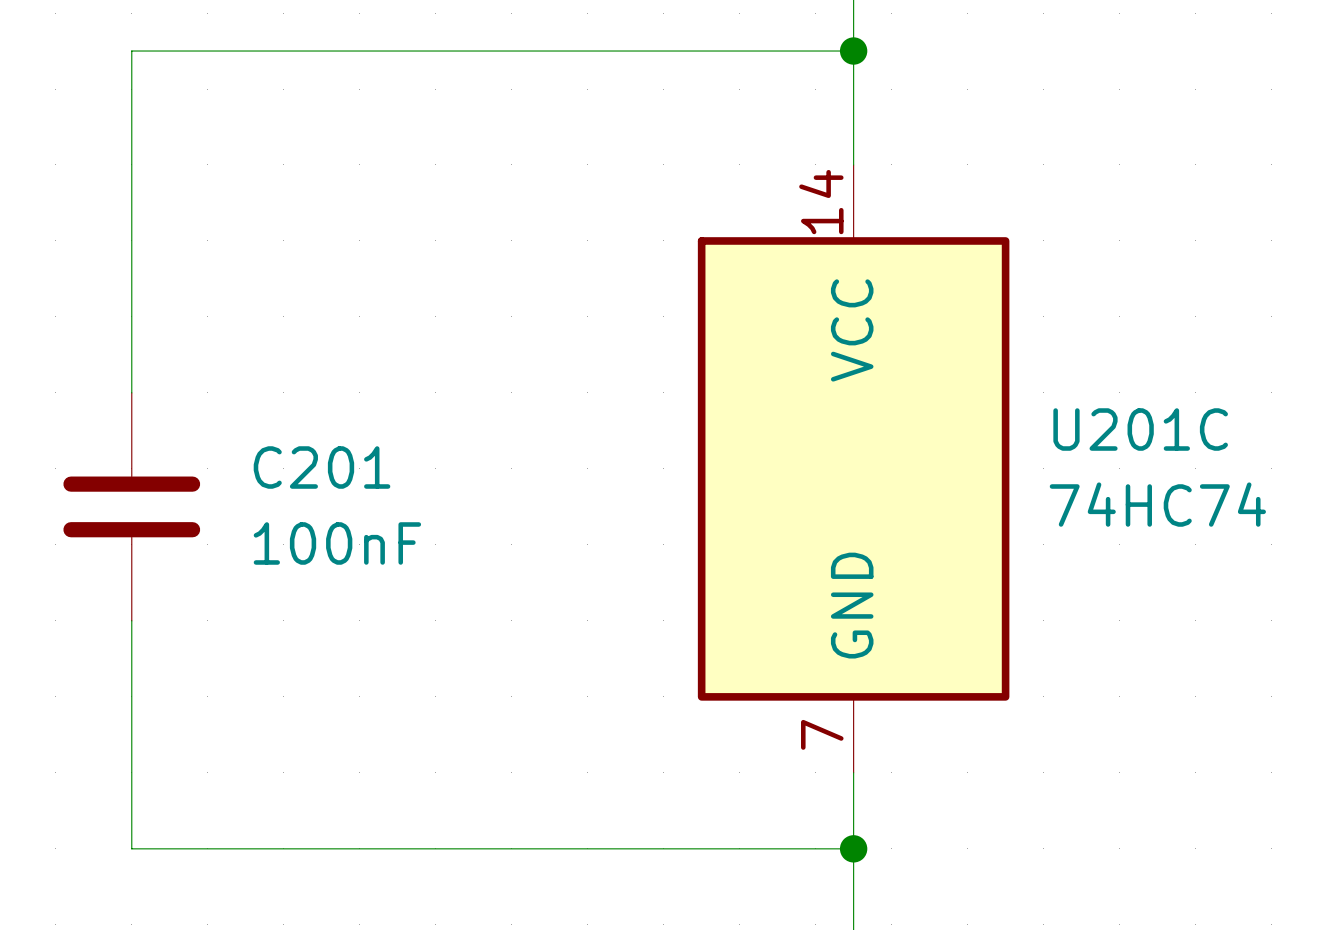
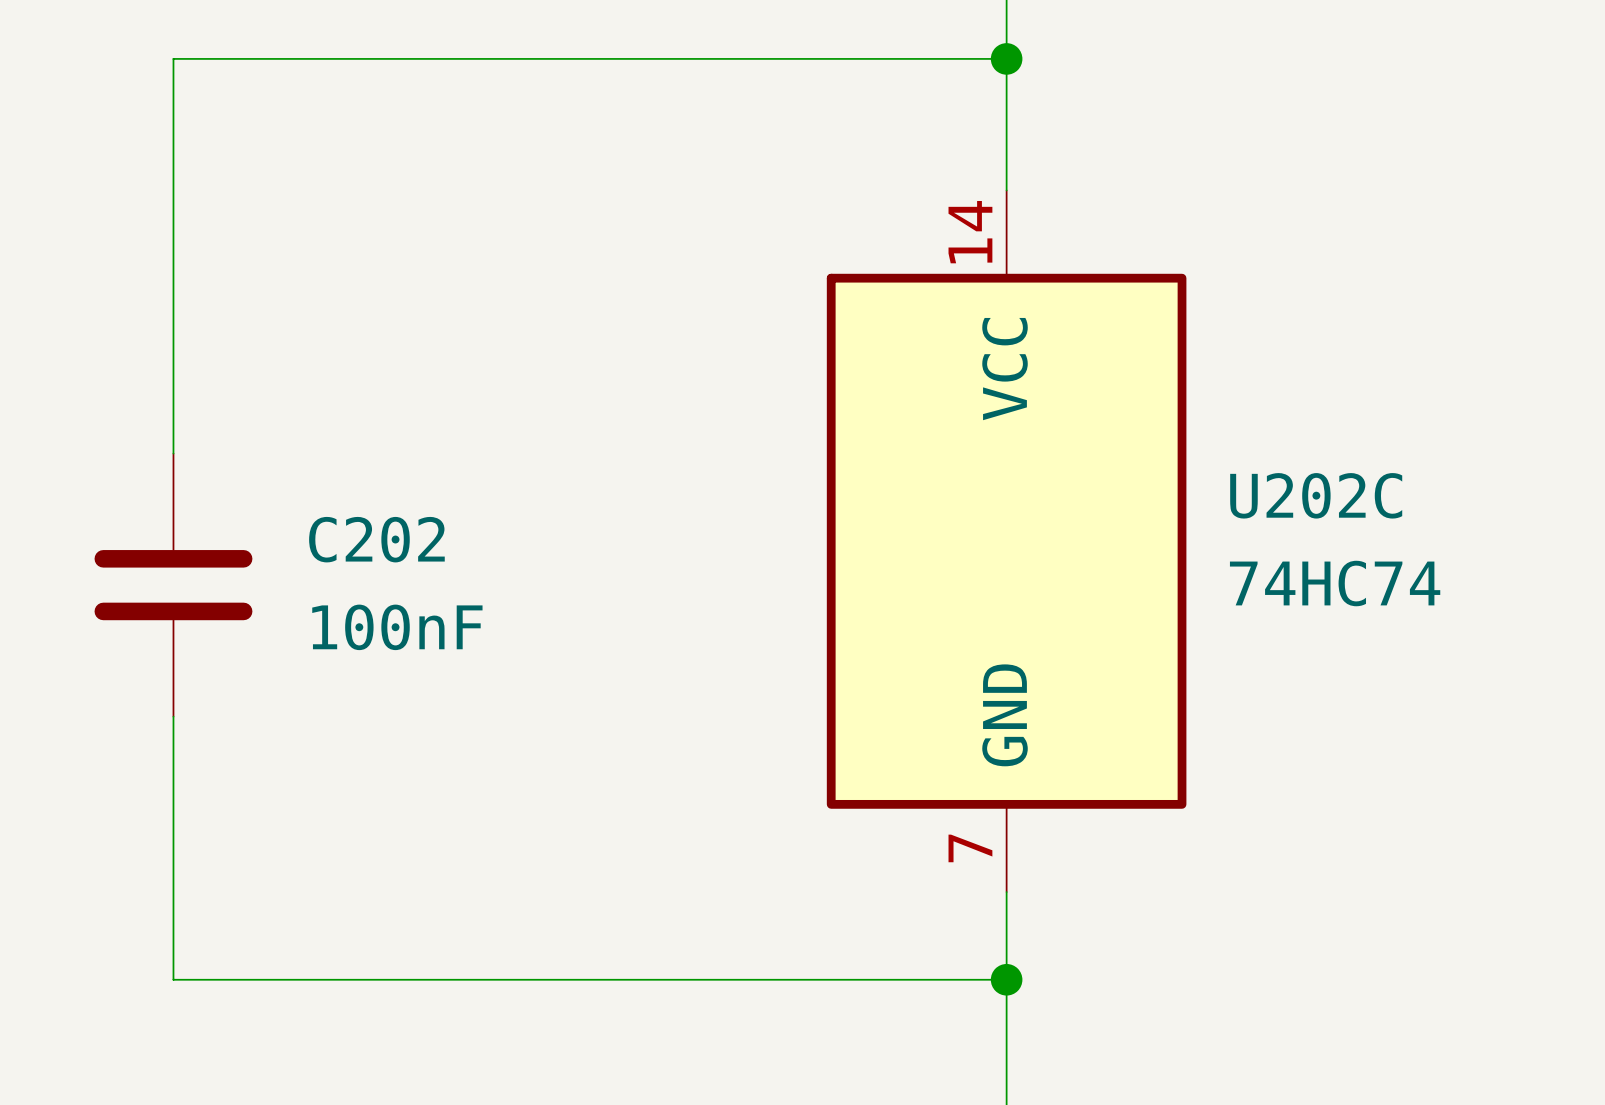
U201C name: U201C (1140, 429) -> U202C (1316, 495)
C201 name: C201 (322, 467) -> C202 (376, 539)

